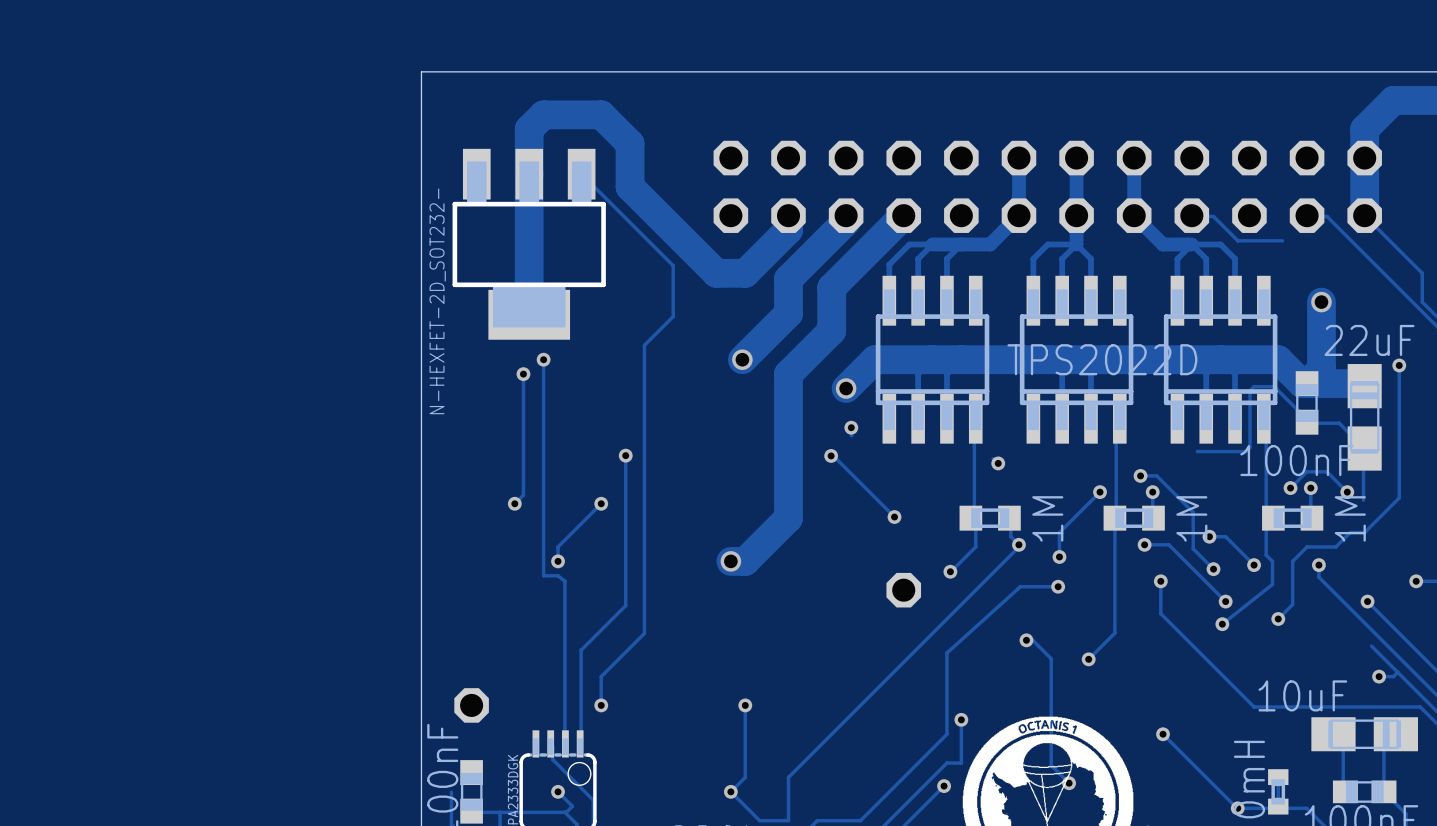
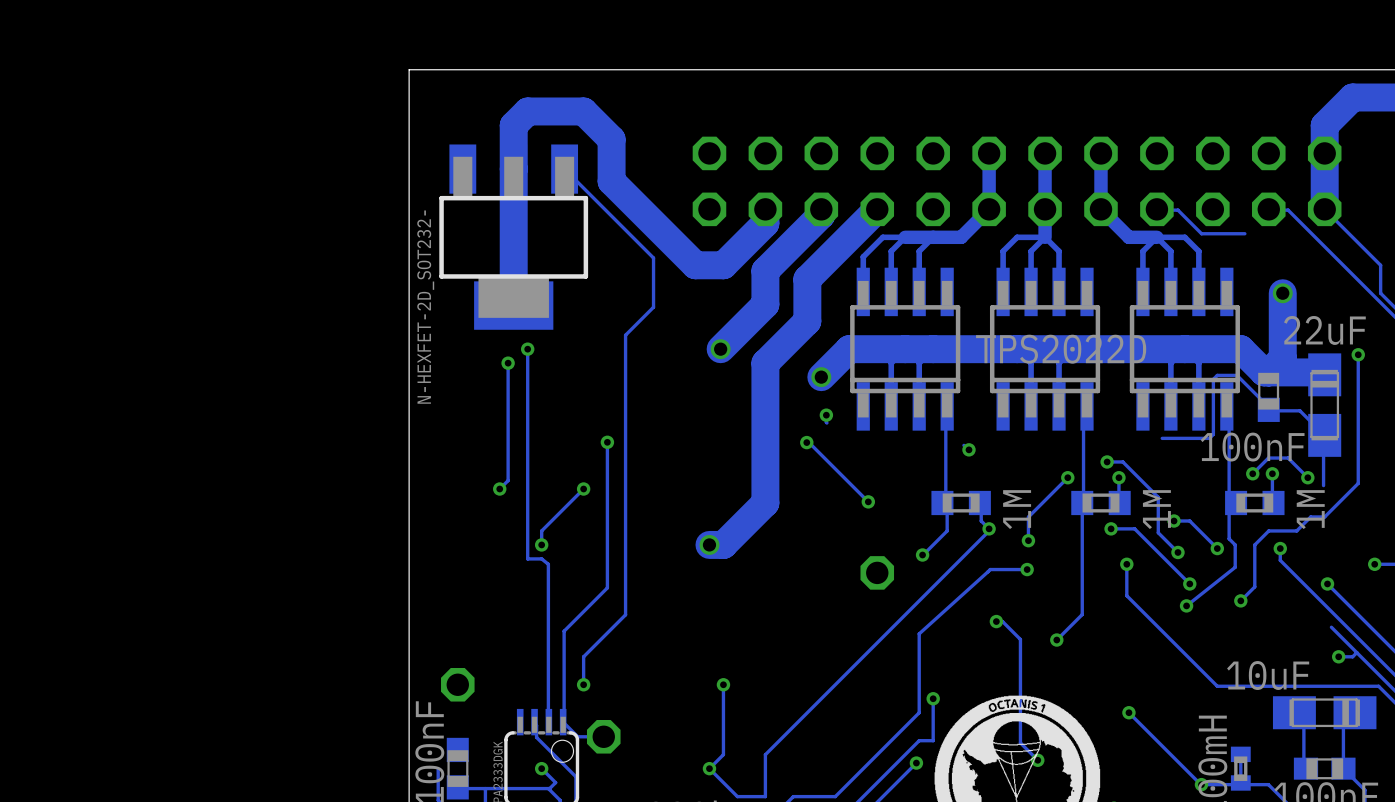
track: none -> (563, 722) (577, 736) (603, 736)
part: none -> (603, 736)

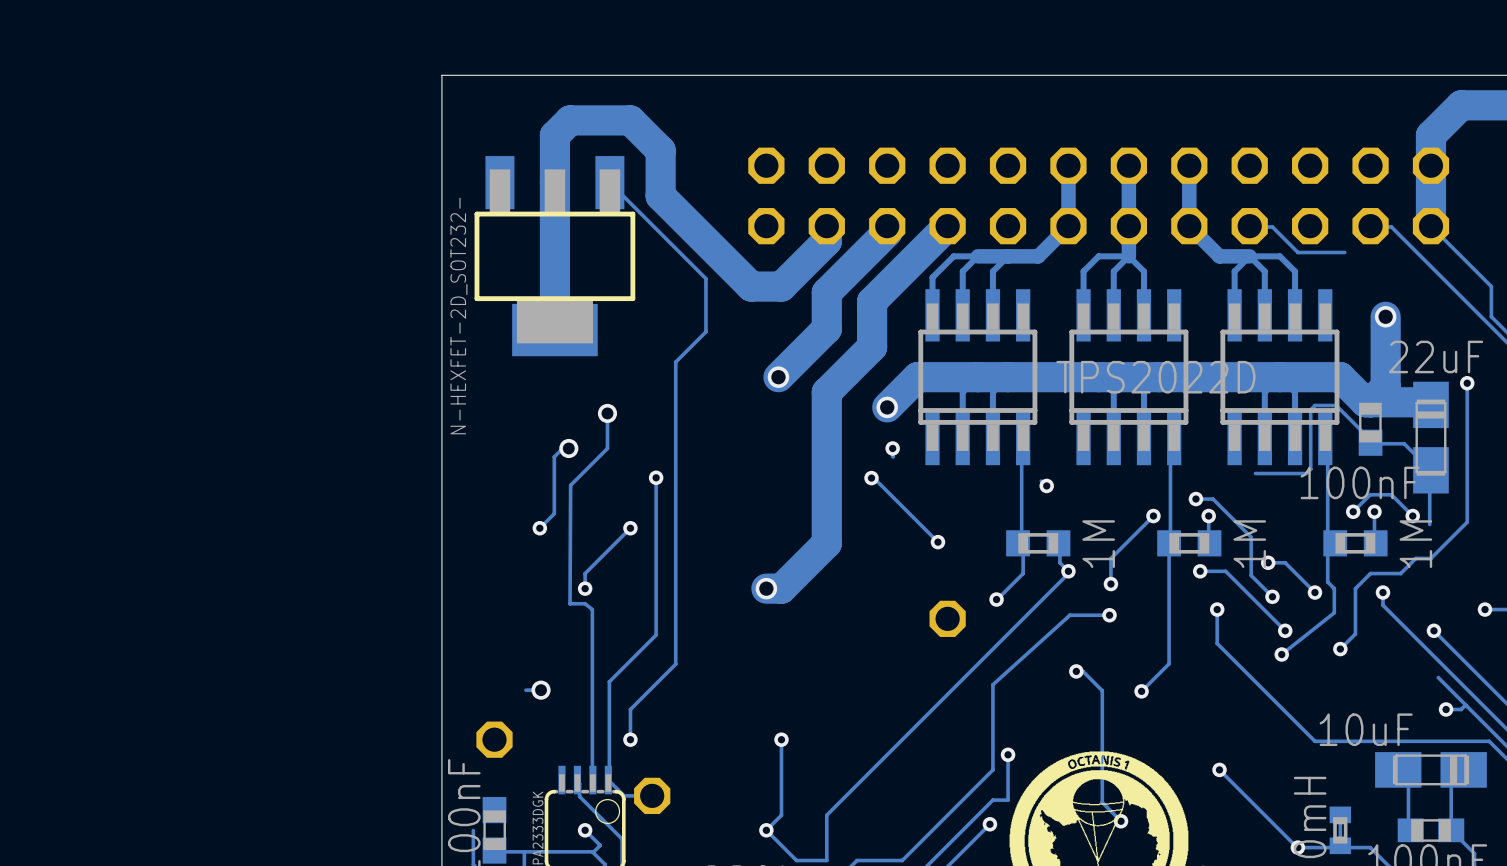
track: (527, 349) (527, 558) -> (607, 413) (607, 448) (570, 485) (570, 603)
via: (527, 349) -> none
track: (508, 363) (508, 480) -> (568, 448) (562, 448) (554, 456) (554, 513) (548, 519)
via: (508, 363) -> none
via: none -> (607, 413)
via: none -> (568, 448)
track: none -> (541, 690) (525, 690)
via: none -> (541, 690)

